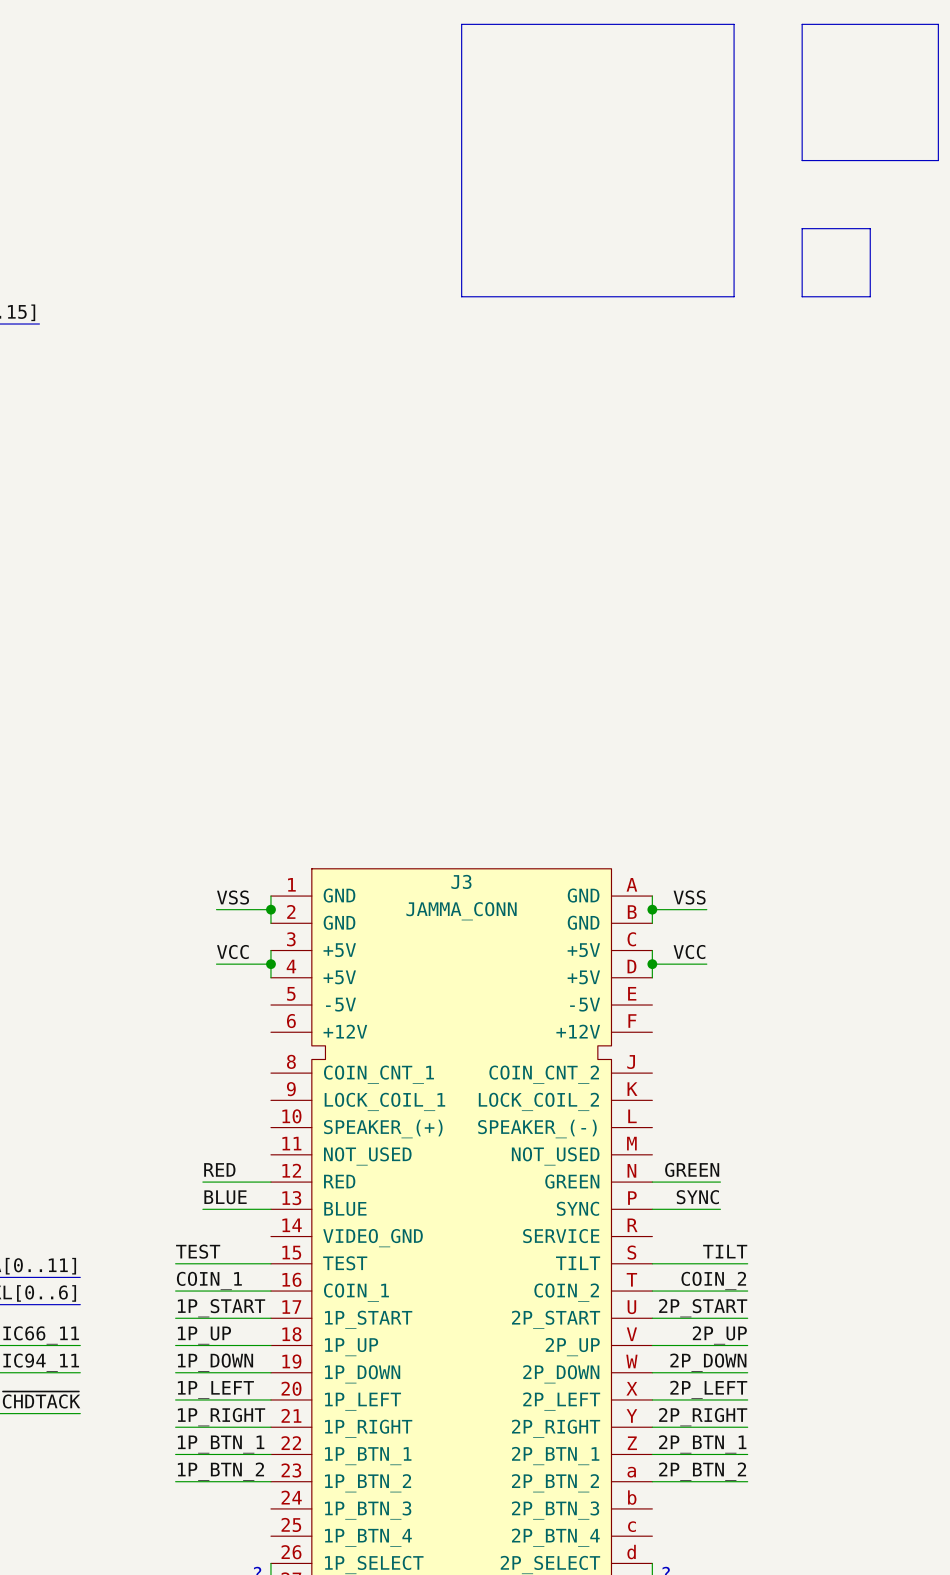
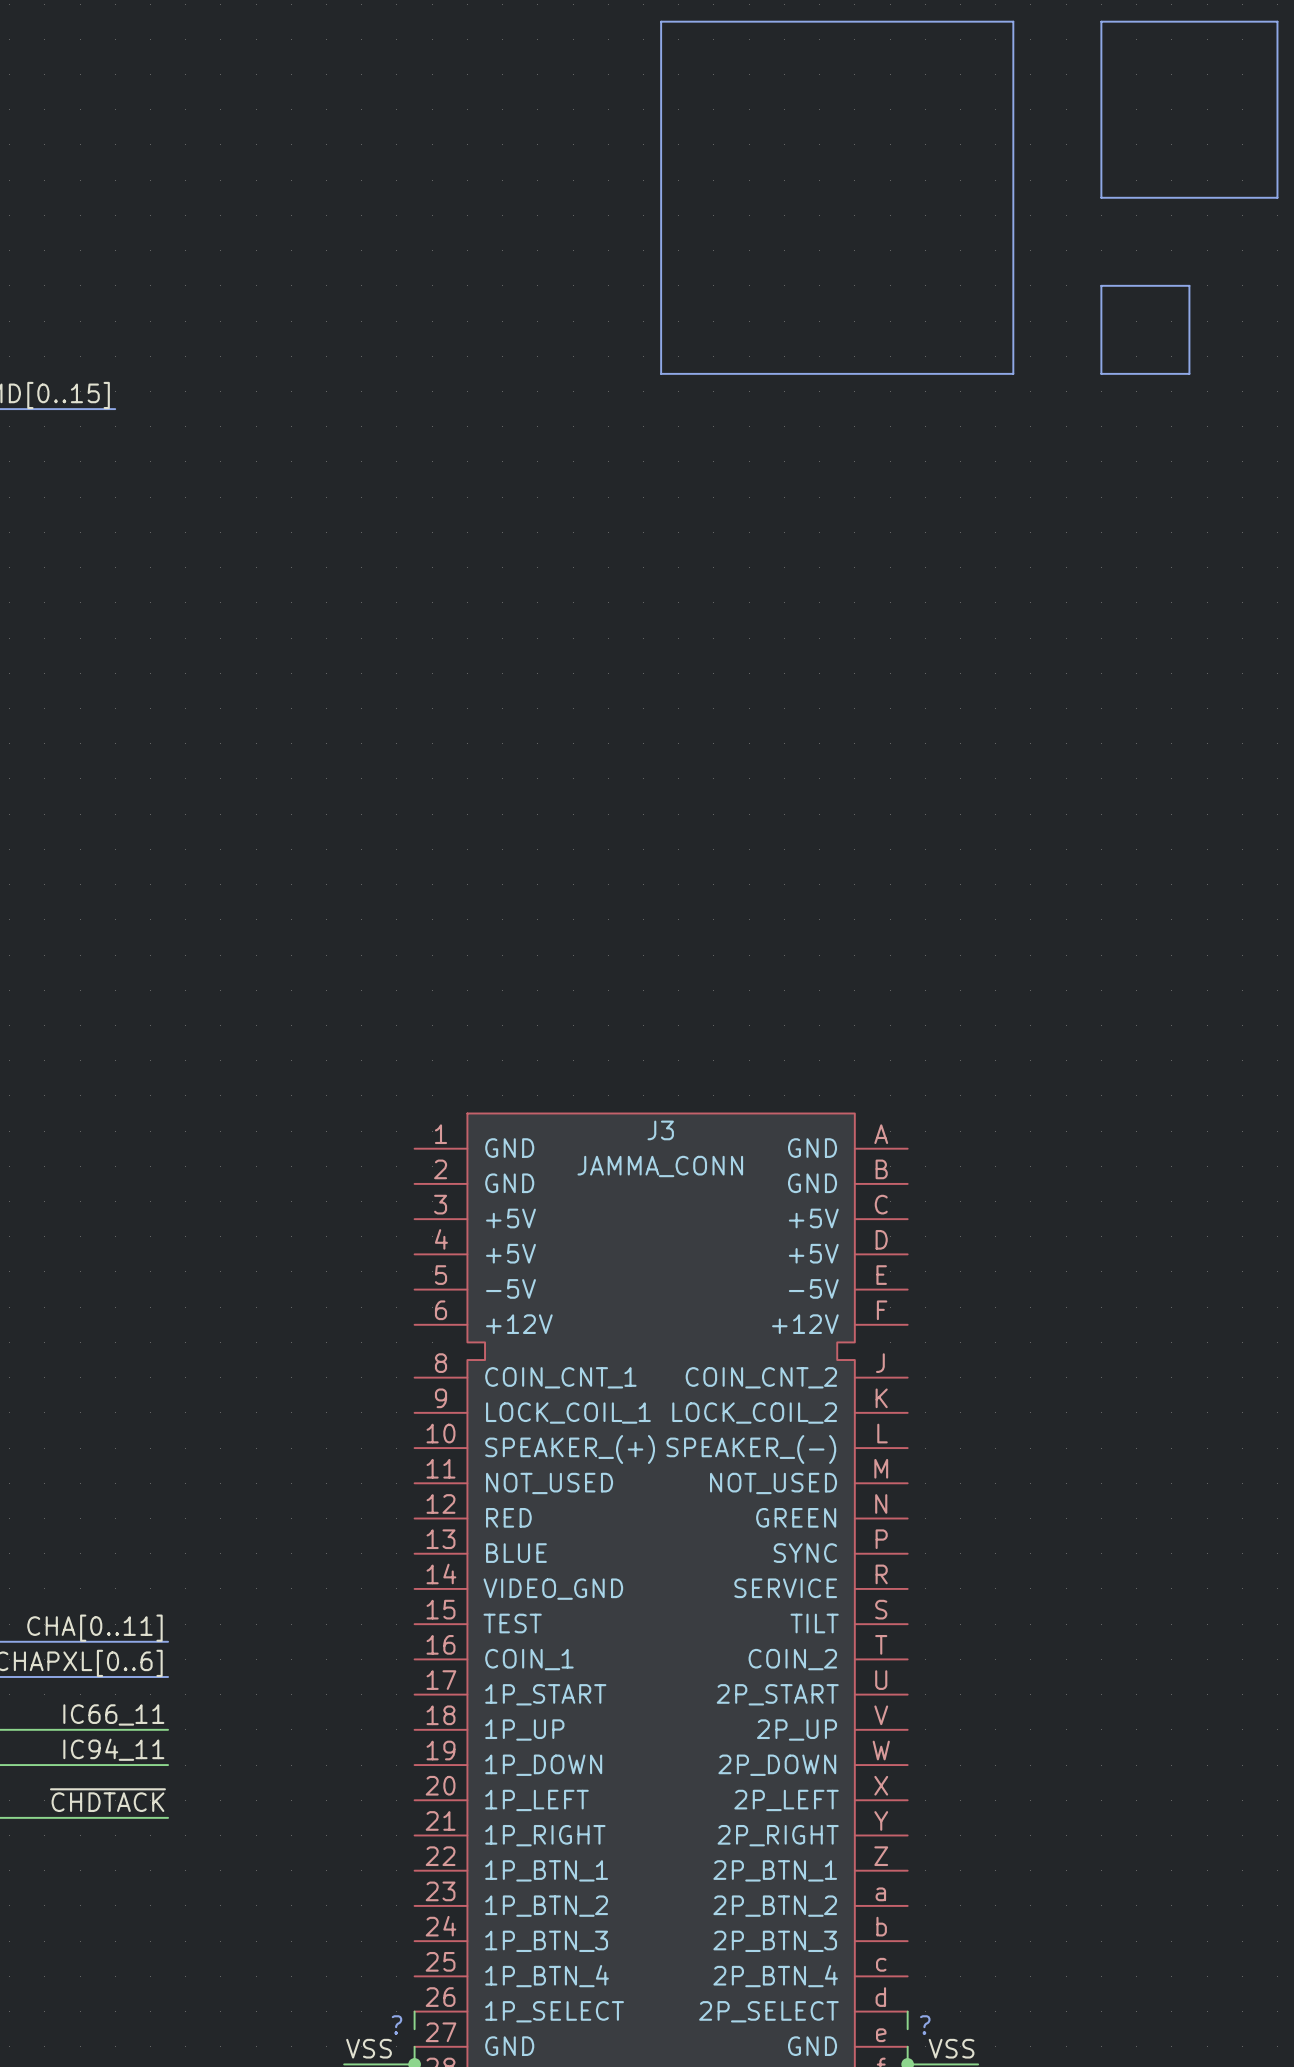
wire: (270, 896) (270, 923) -> none
wire: (652, 896) (652, 923) -> none
label: VSS (233, 897) -> none
label: VSS (689, 897) -> none
wire: (216, 909) (270, 909) -> none
junction: (270, 909) -> none
wire: (652, 909) (706, 909) -> none
junction: (652, 909) -> none
wire: (270, 950) (270, 977) -> none
wire: (652, 950) (652, 977) -> none
label: VCC (232, 952) -> none
label: VCC (689, 952) -> none
wire: (216, 964) (270, 964) -> none
junction: (270, 964) -> none
wire: (652, 964) (706, 964) -> none
junction: (652, 964) -> none
label: RED (219, 1169) -> none
label: GREEN (692, 1169) -> none
wire: (202, 1182) (270, 1182) -> none
wire: (652, 1182) (720, 1182) -> none
label: BLUE (225, 1197) -> none
label: SYNC (697, 1197) -> none
wire: (202, 1209) (270, 1209) -> none
wire: (652, 1209) (720, 1209) -> none
label: TEST (198, 1251) -> none
label: TILT (725, 1251) -> none
wire: (175, 1263) (270, 1263) -> none
wire: (652, 1263) (747, 1263) -> none
label: COIN_1 (209, 1280) -> none
label: COIN_2 (713, 1280) -> none
wire: (175, 1291) (270, 1291) -> none
wire: (652, 1291) (747, 1291) -> none
label: 1P_START (221, 1308) -> none
label: 2P_START (703, 1308) -> none
wire: (175, 1318) (270, 1318) -> none
wire: (652, 1318) (747, 1318) -> none
label: 1P_UP (204, 1335) -> none
label: 2P_UP (719, 1335) -> none
wire: (175, 1345) (270, 1345) -> none
wire: (652, 1345) (747, 1345) -> none
label: 1P_DOWN (215, 1362) -> none
label: 2P_DOWN (708, 1362) -> none
wire: (175, 1372) (270, 1372) -> none
wire: (652, 1372) (747, 1372) -> none
label: 2P_LEFT (708, 1389) -> none
label: 1P_LEFT (215, 1390) -> none
wire: (175, 1399) (270, 1399) -> none
wire: (652, 1399) (747, 1399) -> none
label: 1P_RIGHT (221, 1417) -> none
label: 2P_RIGHT (703, 1417) -> none
wire: (175, 1427) (270, 1427) -> none
wire: (652, 1427) (747, 1427) -> none
label: 1P_BTN_1 (221, 1444) -> none
label: 2P_BTN_1 (702, 1444) -> none
wire: (175, 1454) (270, 1454) -> none
wire: (652, 1454) (747, 1454) -> none
label: 1P_BTN_2 (220, 1471) -> none
label: 2P_BTN_2 (702, 1471) -> none
wire: (175, 1481) (270, 1481) -> none
wire: (652, 1481) (747, 1481) -> none

